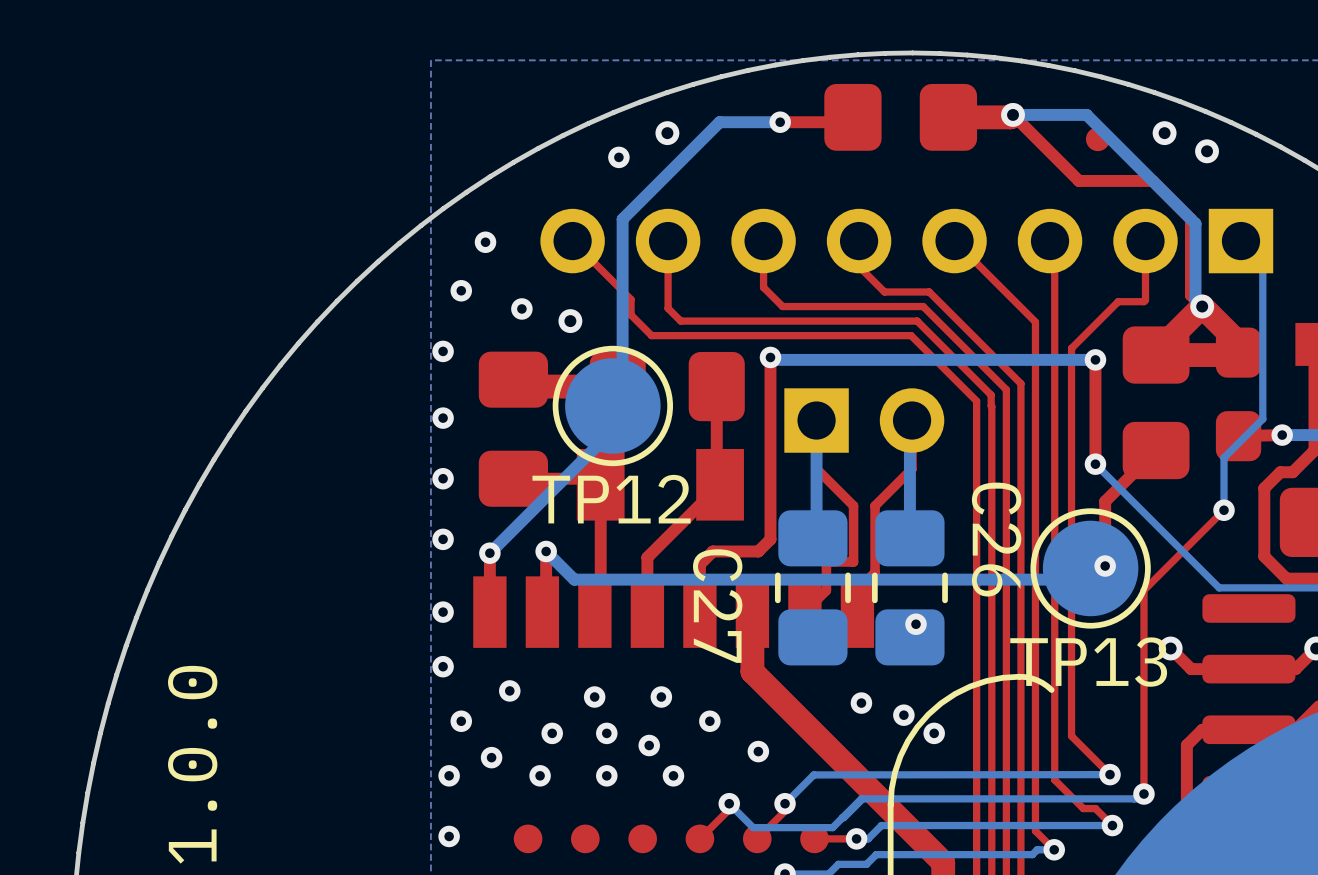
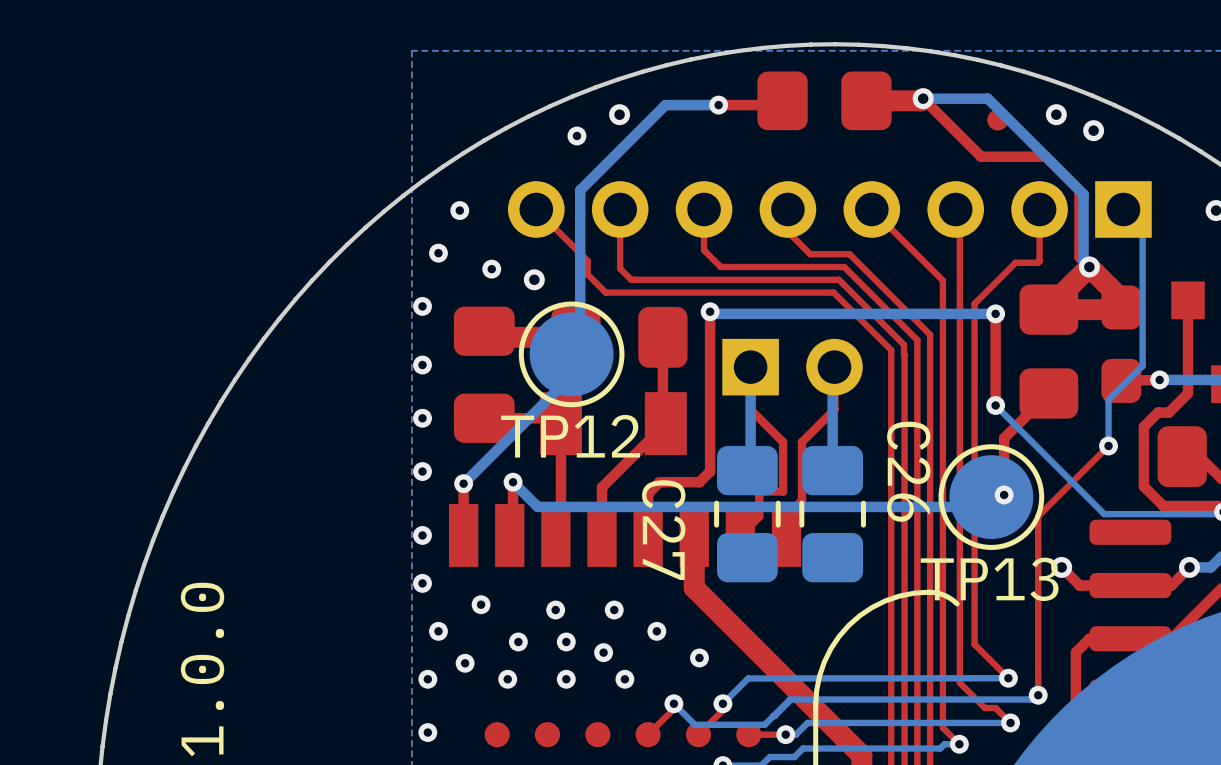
via: (916, 624) -> none
via: (861, 703) -> none
via: (903, 715) -> none
via: (934, 733) -> none

